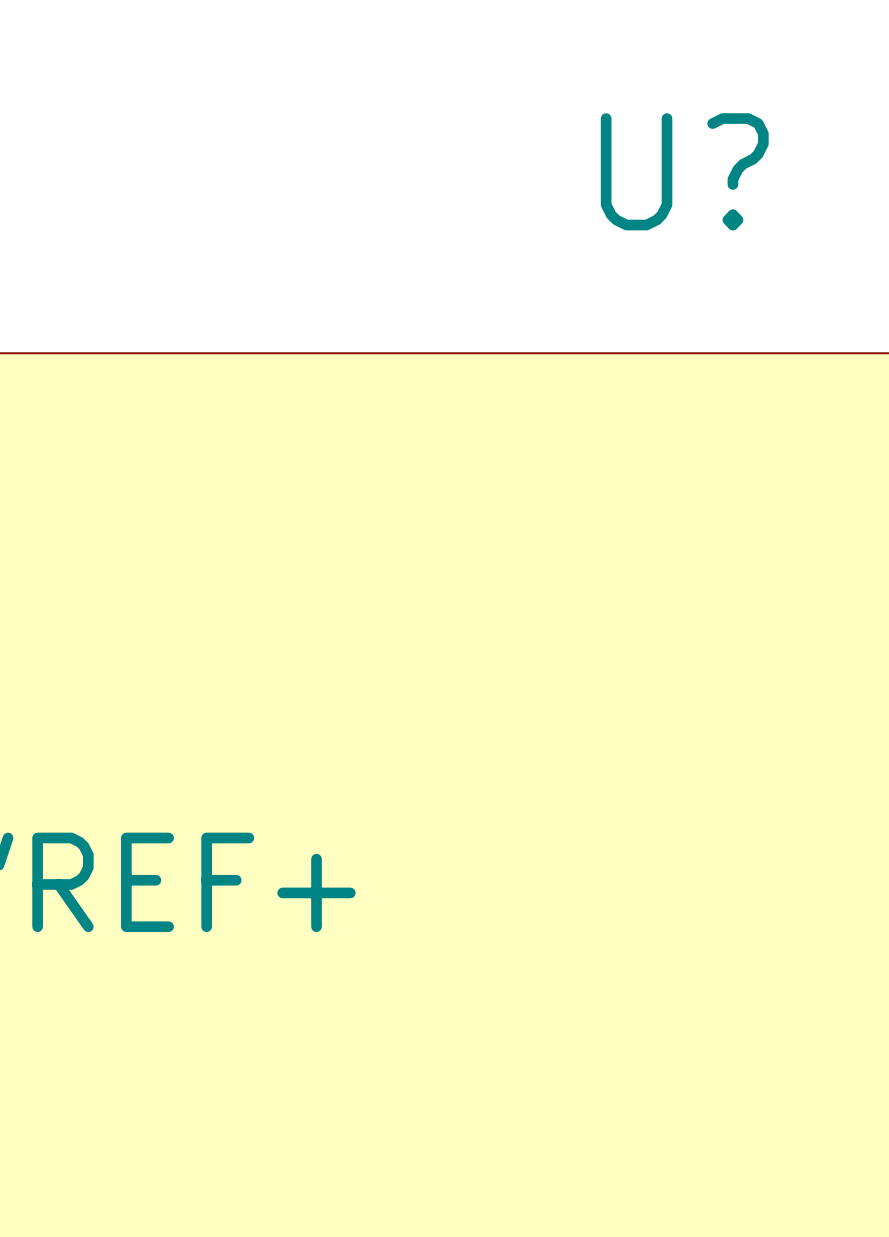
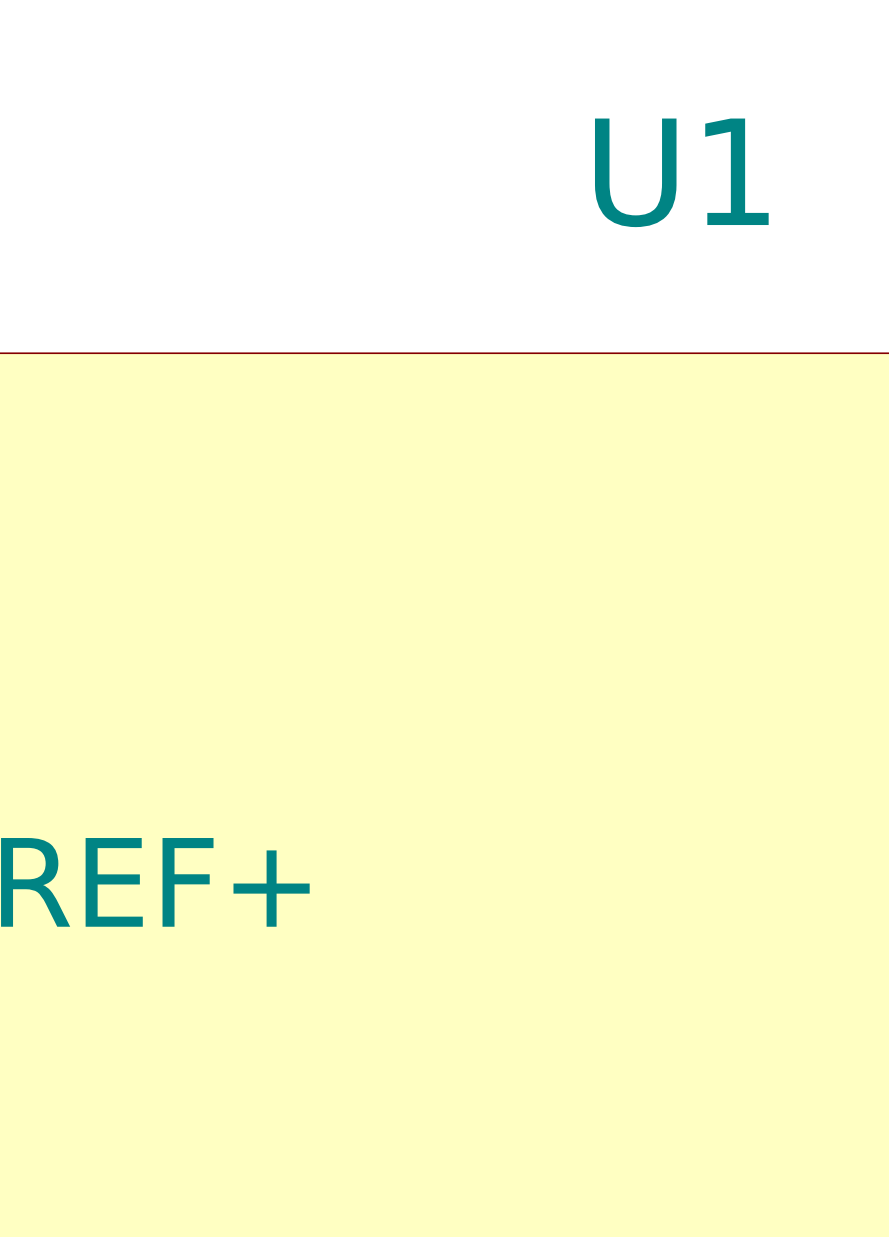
U? name: U? (684, 171) -> U1 (681, 172)

